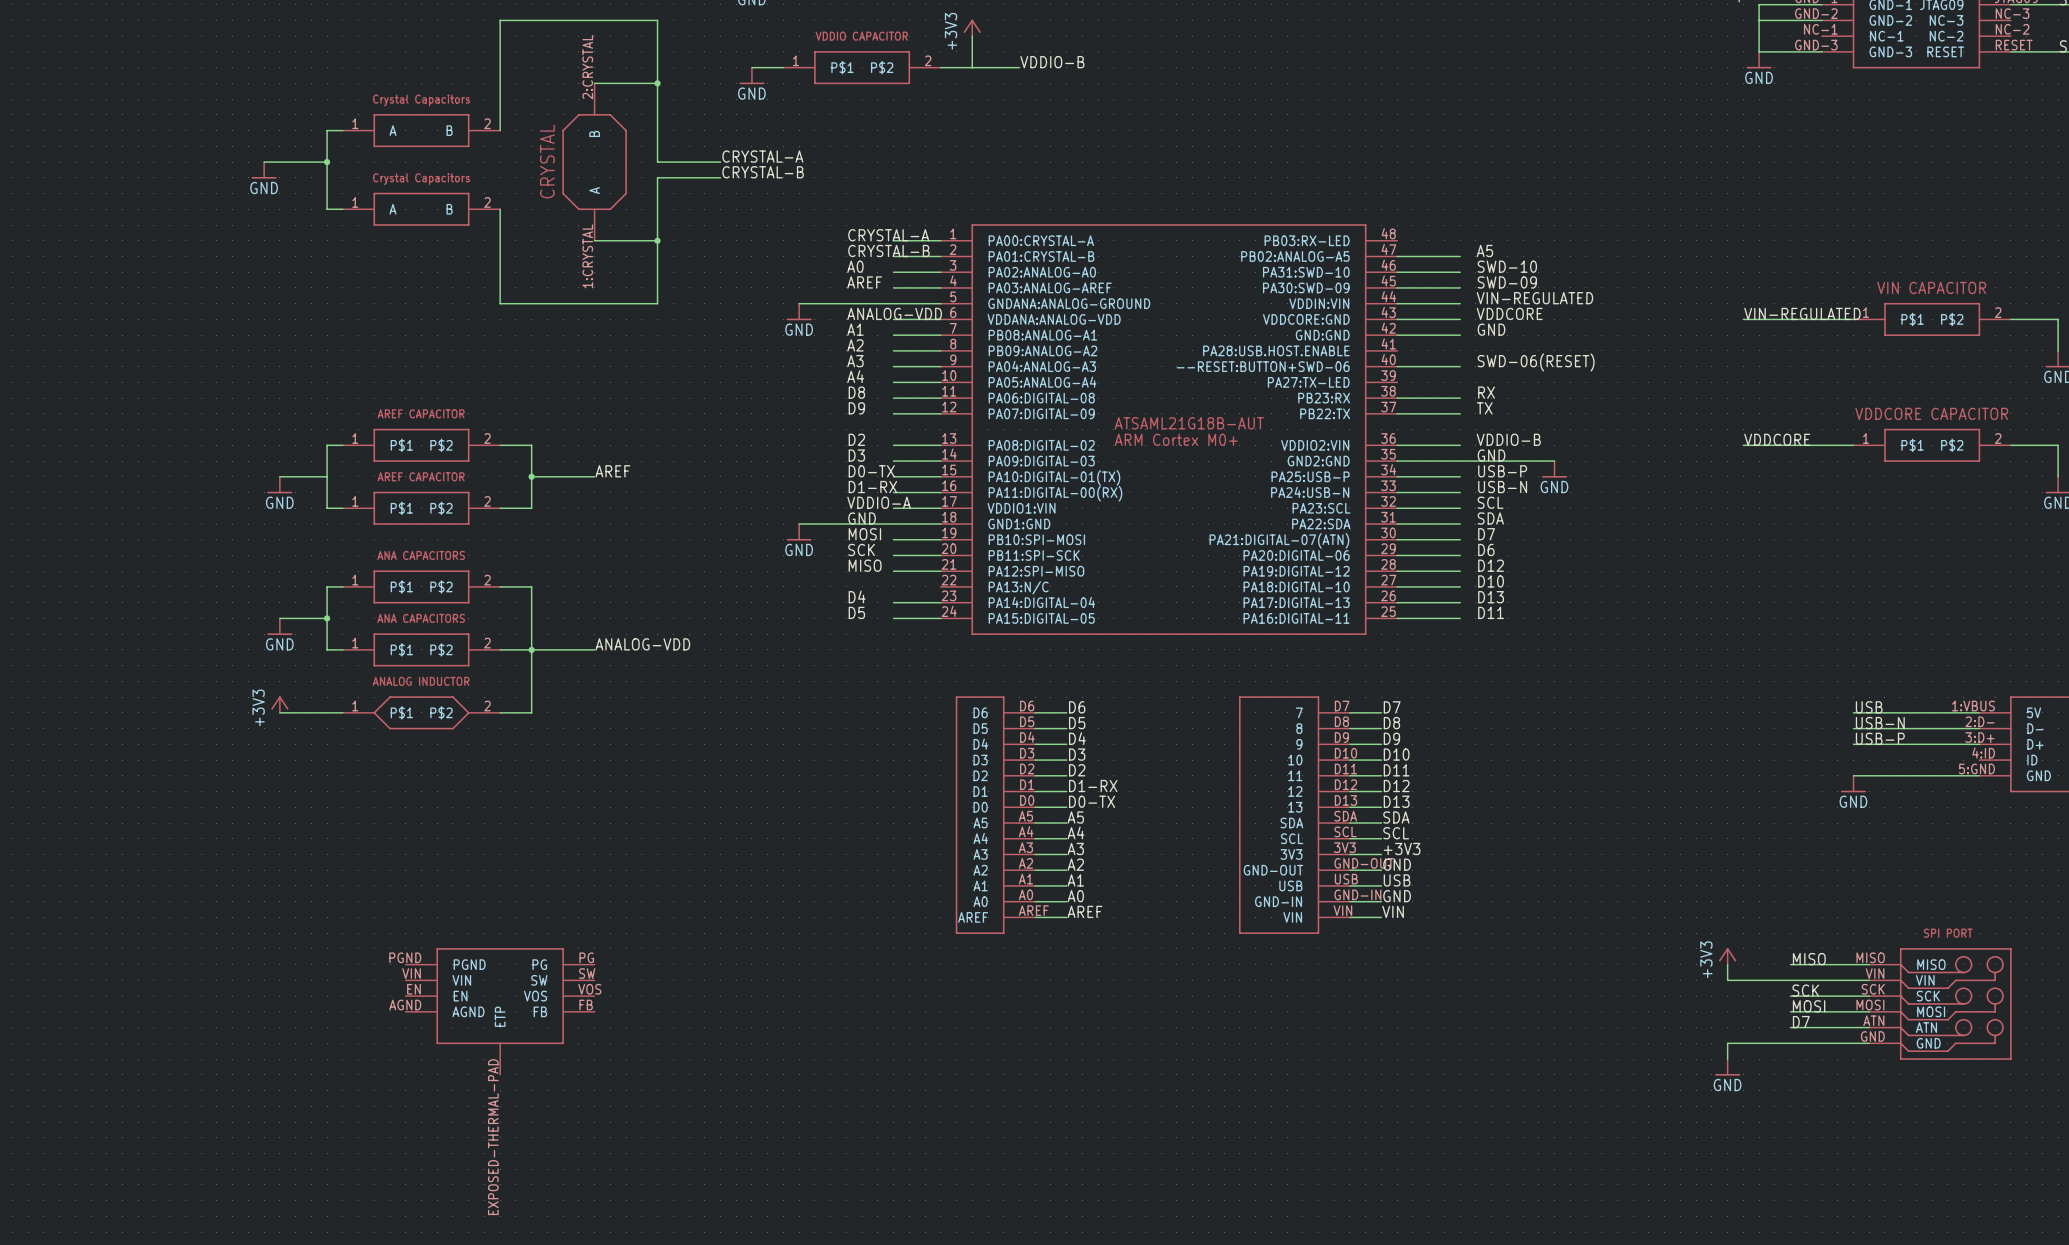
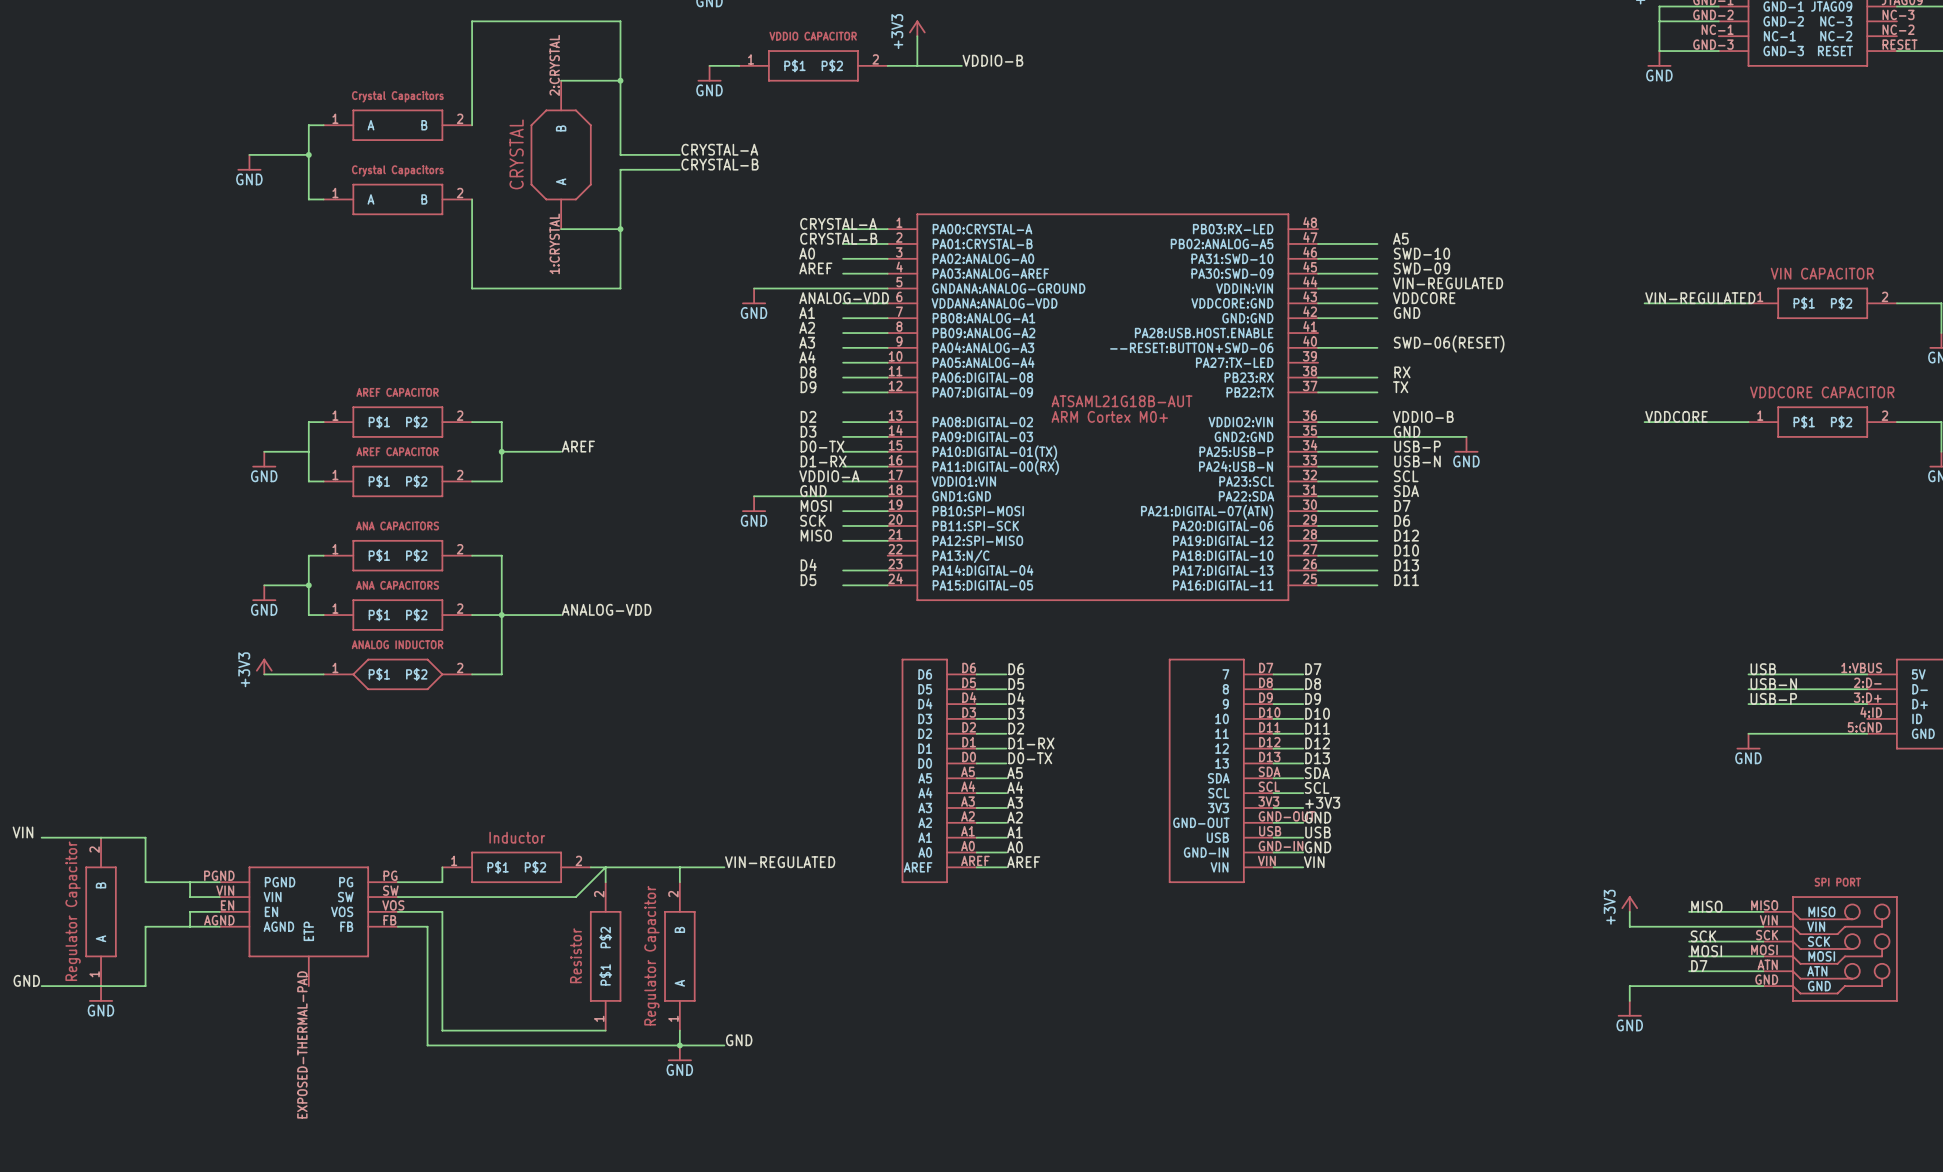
label: none -> VIN (22, 832)
wire: none -> (41, 837) (145, 837) (145, 882) (219, 882)
label: none -> VIN-REGULATED (780, 862)
wire: none -> (442, 867) (442, 882) (397, 882)
part: none -> (516, 867)
wire: none -> (590, 867) (724, 867)
wire: none -> (679, 867) (679, 882)
wire: none -> (190, 882) (190, 897) (219, 897)
wire: none -> (605, 882) (605, 867) (575, 897) (397, 897)
part: none -> (101, 911)
wire: none -> (219, 911) (190, 911) (190, 926)
wire: none -> (397, 911) (442, 911) (442, 1030) (605, 1030)
part: none -> (308, 926)
wire: none -> (219, 926) (145, 926) (145, 986) (41, 986)
wire: none -> (397, 926) (427, 926) (427, 1045) (724, 1045)
part: (500, 1011) -> none
part: none -> (605, 956)
part: none -> (679, 956)
label: none -> GND (26, 980)
power symbol: none -> GND (101, 993)
wire: none -> (679, 1030) (679, 1045)
label: none -> GND (739, 1040)
junction: none -> (679, 1045)
power symbol: none -> GND (679, 1053)

